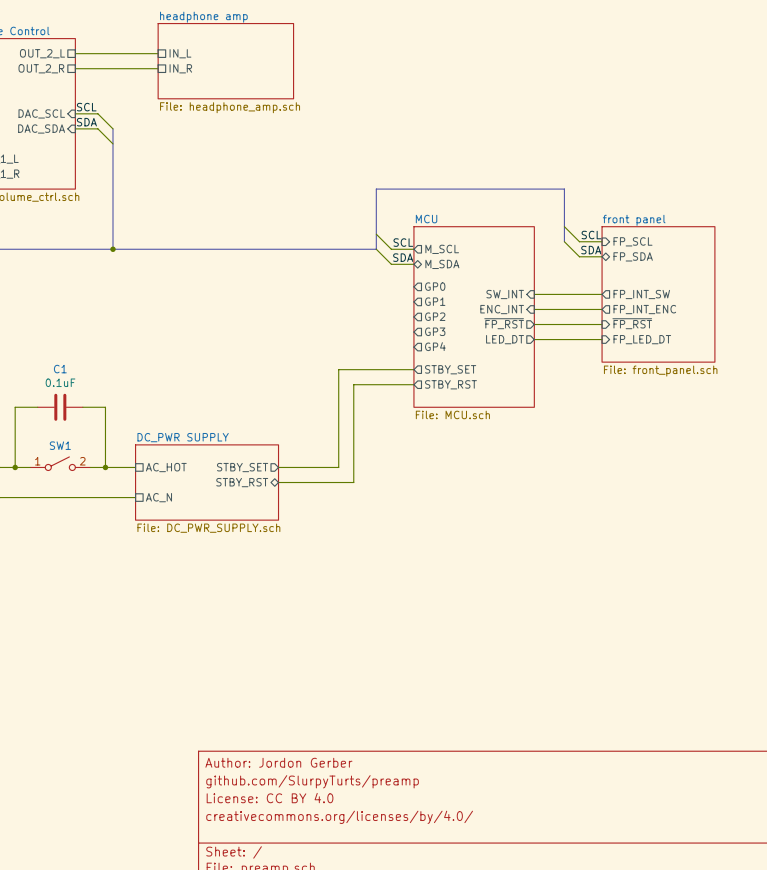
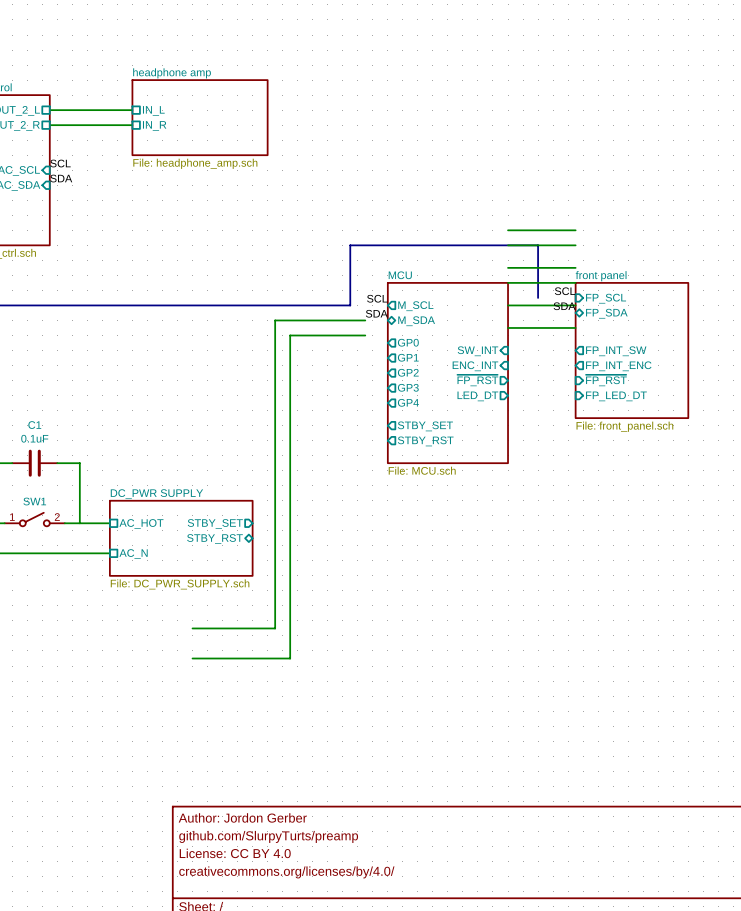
wire: (75, 113) (97, 113) (112, 128) -> none
wire: (75, 128) (97, 128) (112, 143) -> none
bus: (112, 128) (112, 249) -> none
wire: none -> (508, 230) (575, 230)
wire: (564, 226) (579, 241) (602, 241) -> none
wire: (376, 234) (391, 249) (413, 249) -> none
wire: (564, 241) (579, 256) (602, 256) -> none
junction: (112, 249) -> none
wire: (376, 249) (391, 264) (413, 264) -> none
wire: none -> (508, 305) (575, 305)
wire: none -> (365, 320) (275, 320) (275, 628) (192, 628)
wire: none -> (365, 335) (290, 335) (290, 658) (192, 658)
wire: (534, 294) (602, 294) -> (508, 282) (575, 282)
wire: (534, 309) (602, 309) -> (508, 267) (575, 267)
wire: (534, 324) (602, 324) -> (508, 245) (575, 245)
wire: (534, 339) (602, 339) -> (508, 327) (575, 327)
wire: (413, 369) (338, 369) (338, 467) (278, 467) -> none
wire: (413, 384) (353, 384) (353, 482) (278, 482) -> none
junction: (105, 467) -> none

